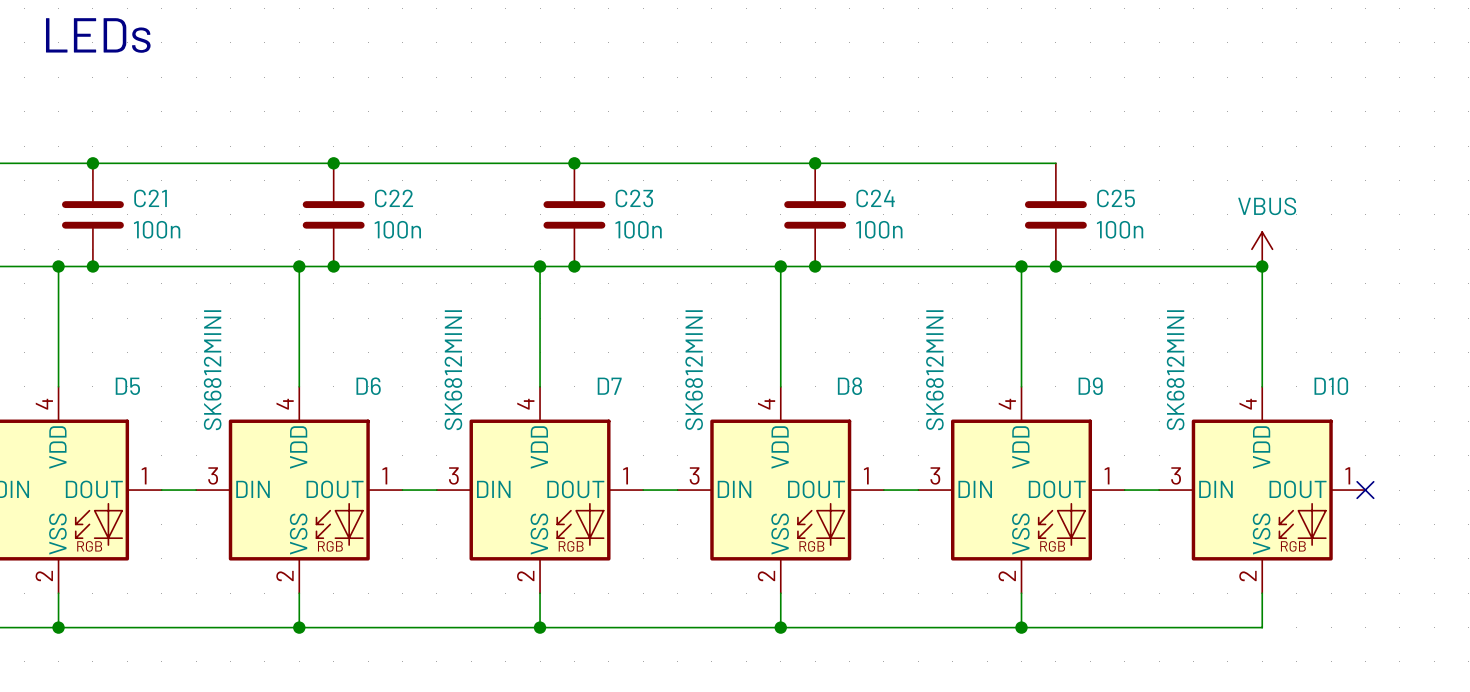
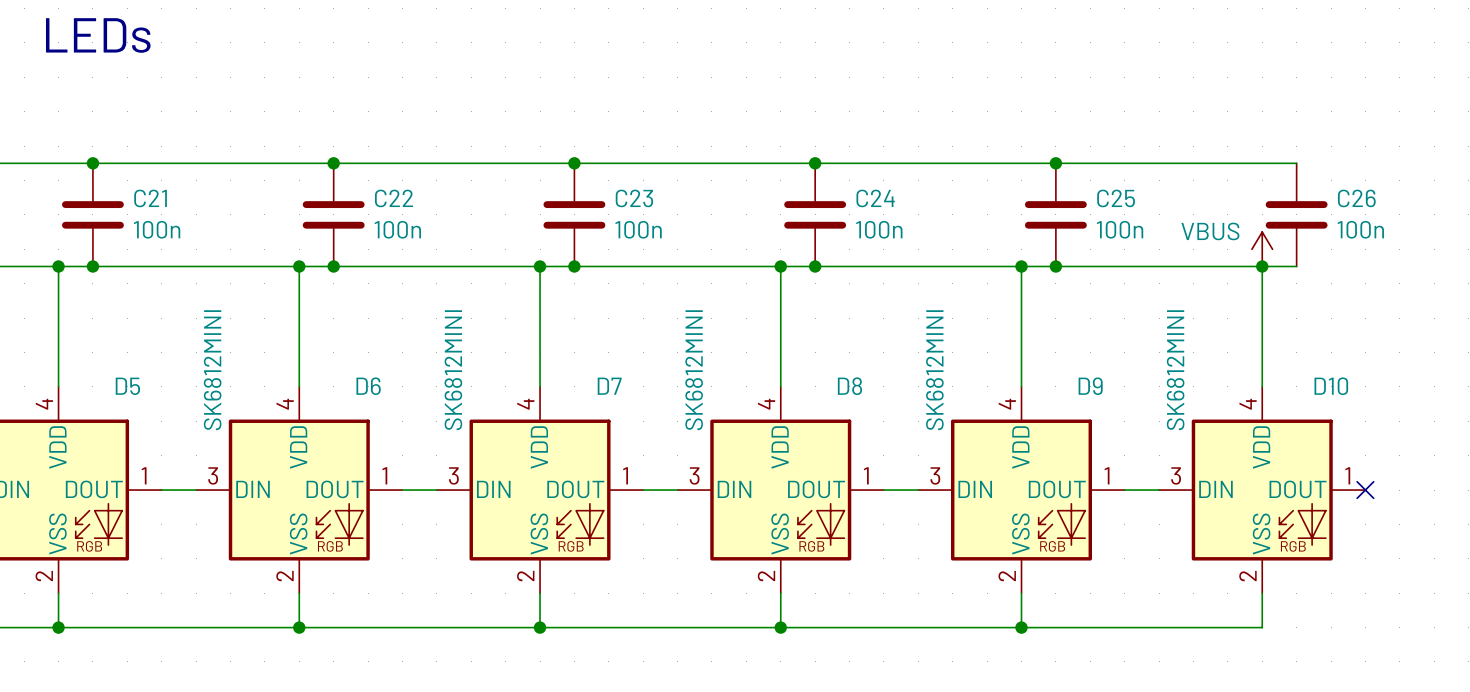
wire: none -> (1055, 163) (1296, 163)
junction: none -> (1055, 163)
power symbol text position: VBUS (1267, 206) -> VBUS (1210, 231)
C26: none -> 100n (1296, 214)
wire: none -> (1262, 266) (1296, 266)

